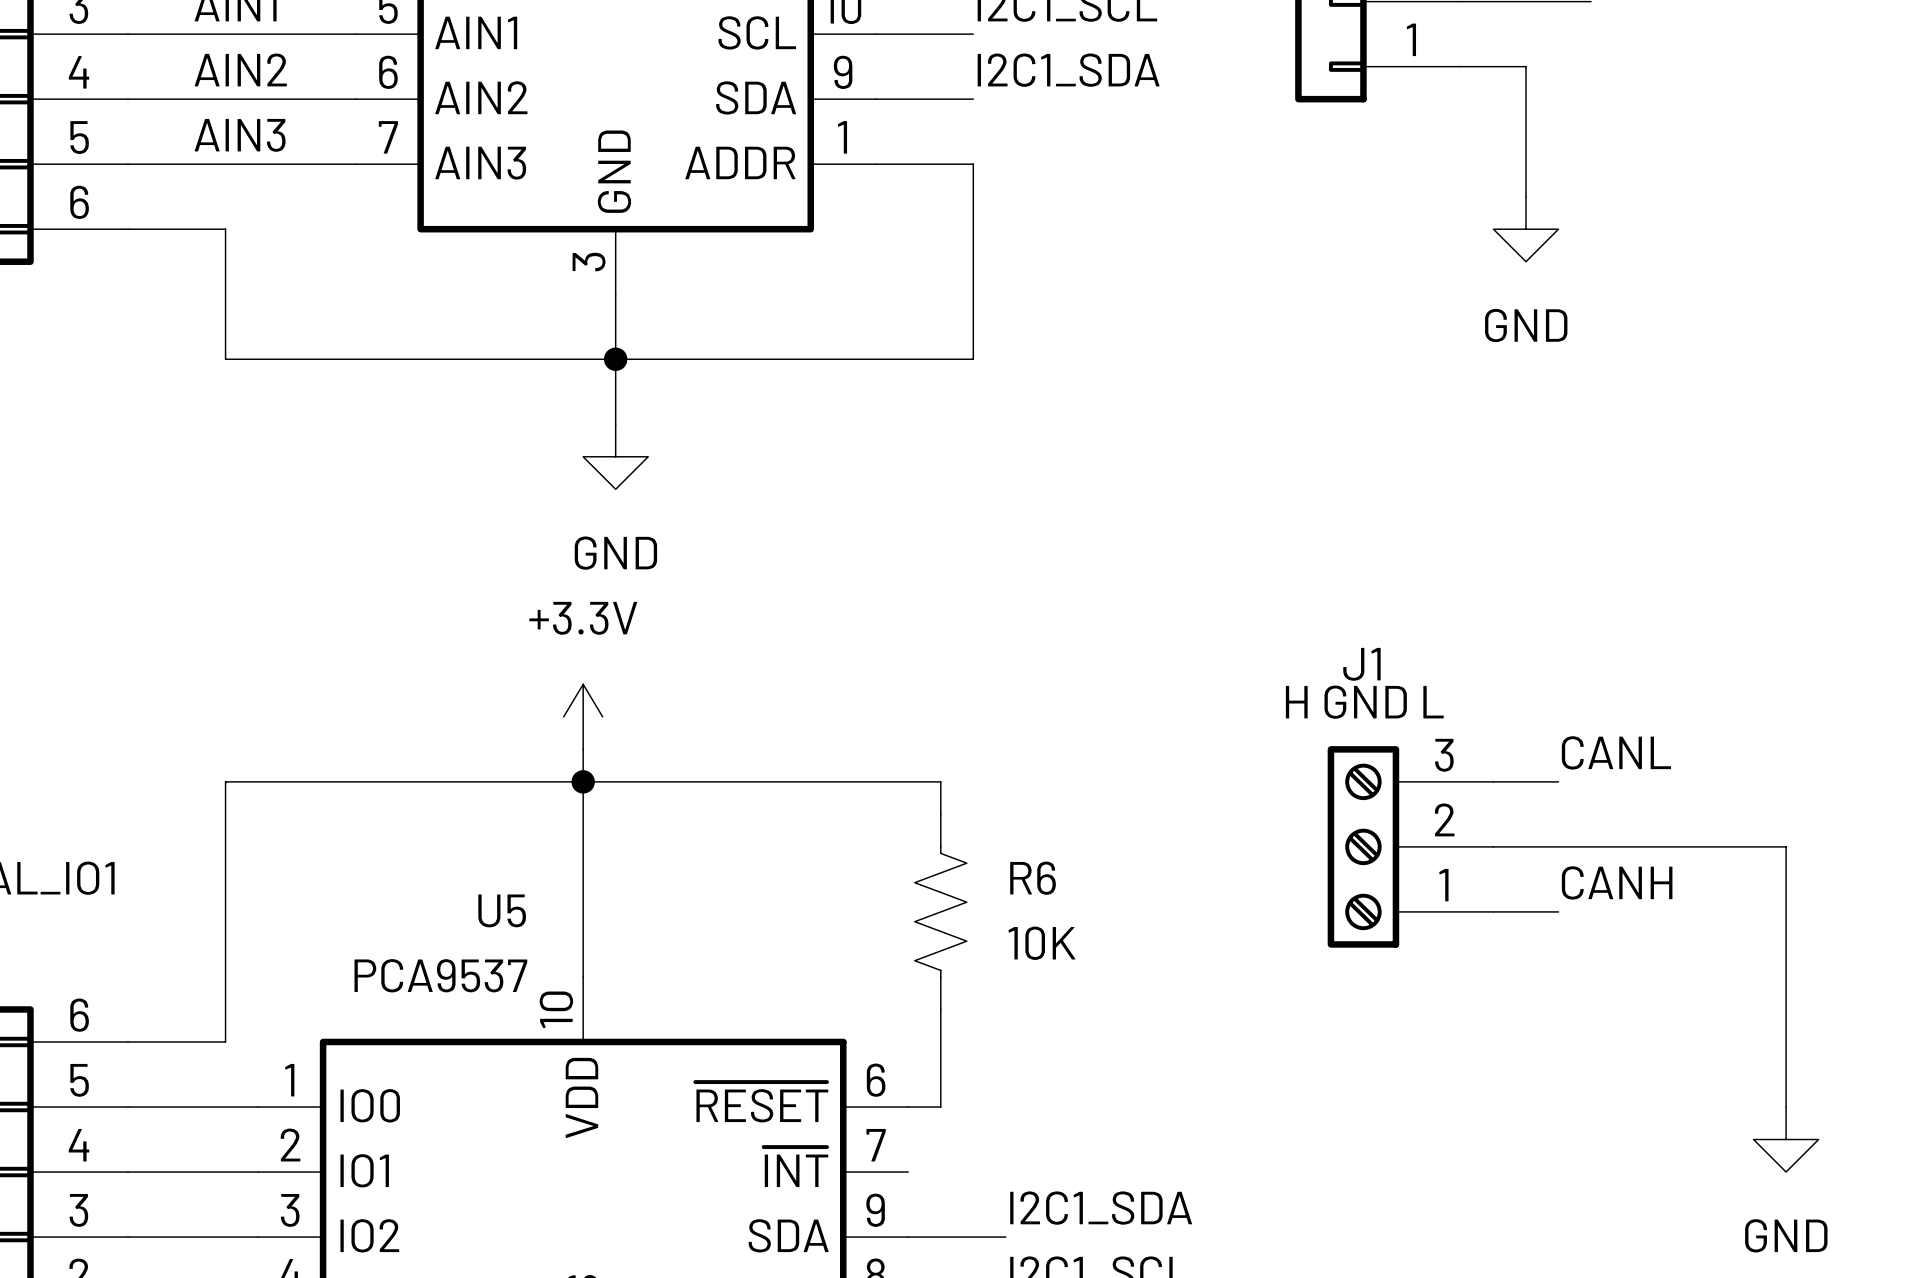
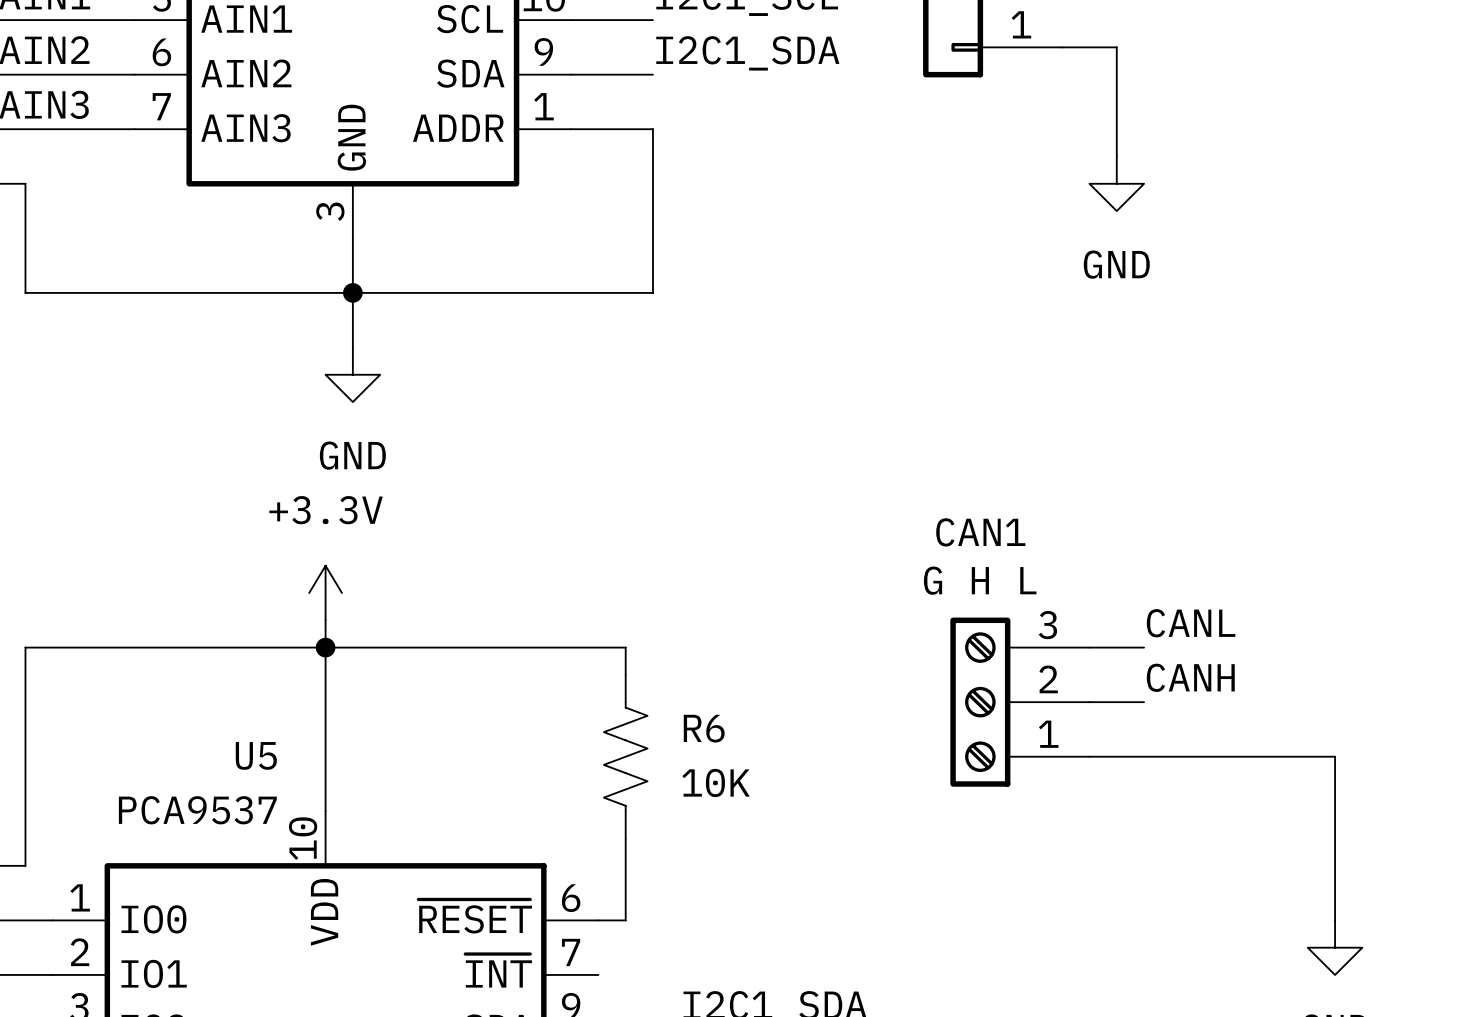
J1 name: J1 (1361, 664) -> CAN1 (980, 532)
J1 value: H GND L (1364, 702) -> G H L (980, 580)
wire: (1558, 846) (1786, 846) (1786, 911) -> (1144, 756) (1335, 756)
label position: CANH (1617, 882) -> CANH (1190, 677)

